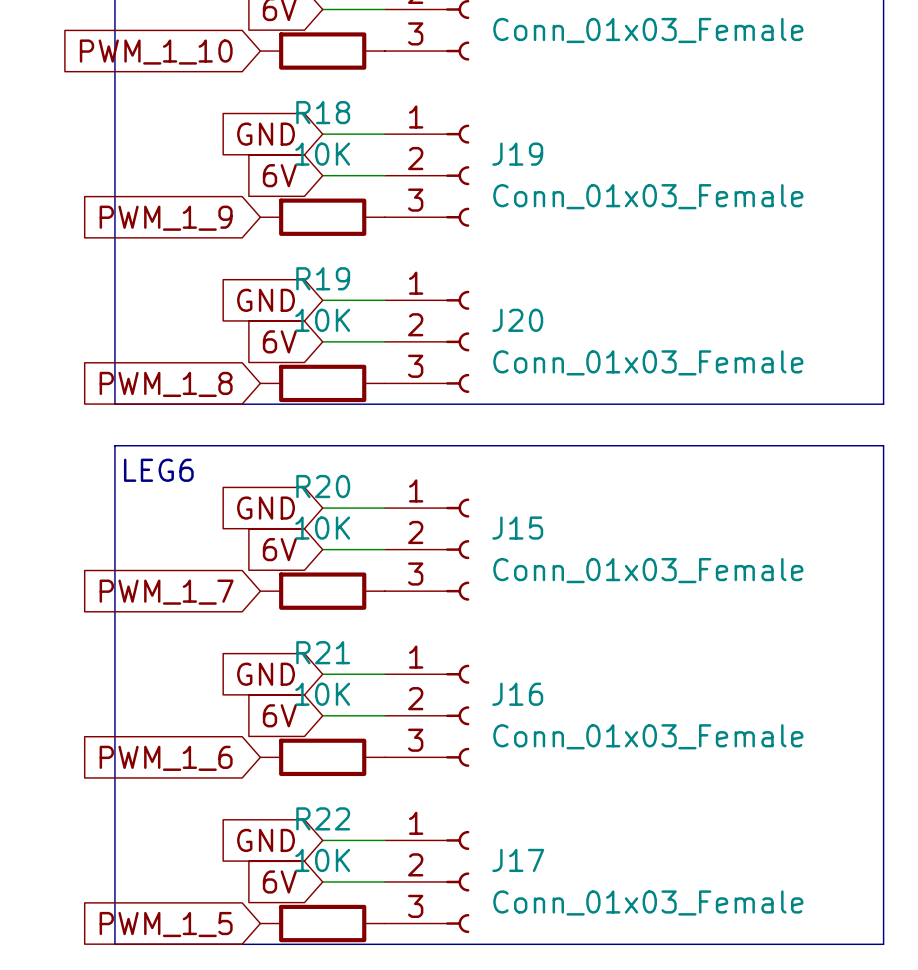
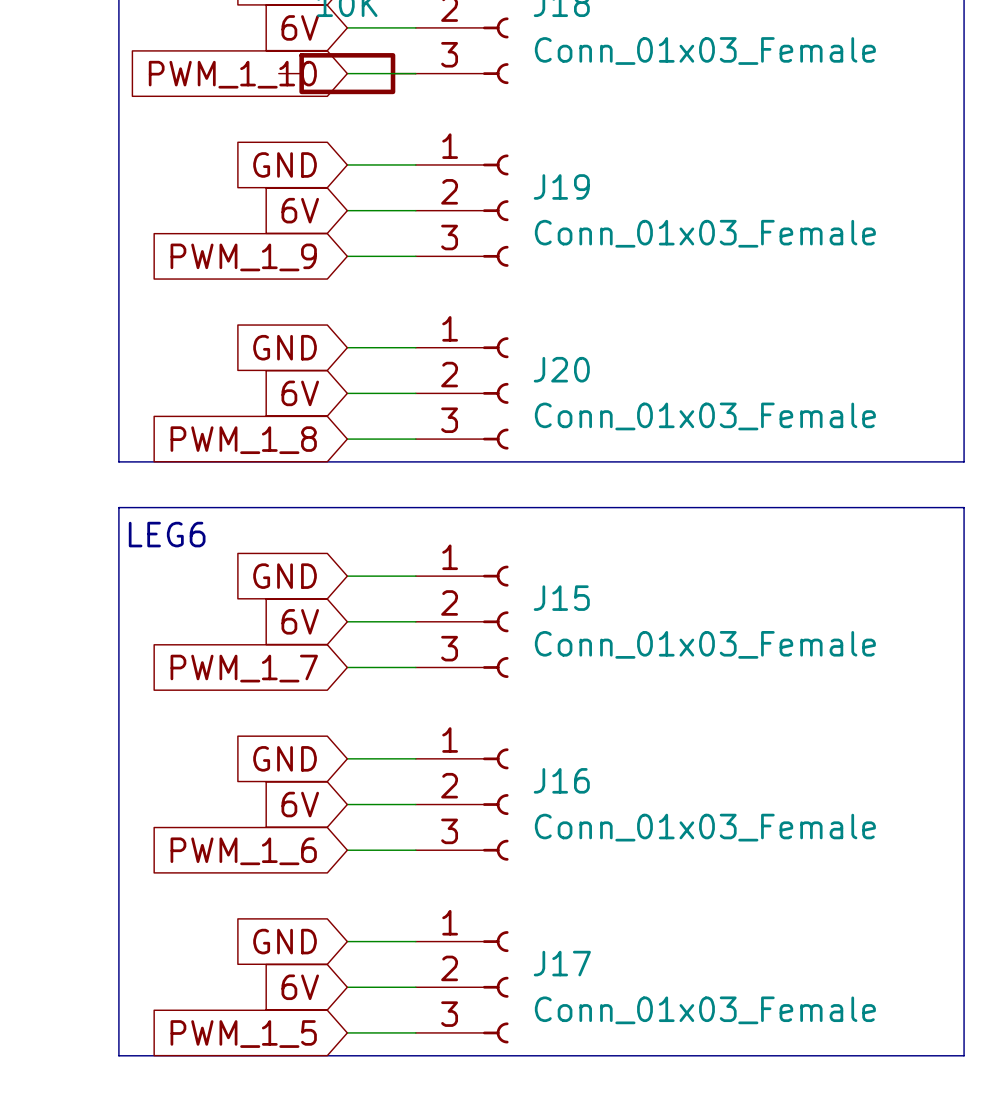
wire: none -> (347, 73) (415, 73)
global label position: PWM_1_10 (156, 52) -> PWM_1_10 (232, 74)
wire: none -> (347, 256) (415, 256)
R18: 10K (322, 217) -> none
global label position: PWM_1_9 (166, 218) -> PWM_1_9 (243, 257)
wire: none -> (347, 439) (415, 439)
R19: 10K (322, 383) -> none
global label position: PWM_1_8 (166, 384) -> PWM_1_8 (243, 440)
wire: none -> (347, 667) (415, 667)
R20: 10K (322, 591) -> none
global label position: PWM_1_7 (166, 592) -> PWM_1_7 (244, 668)
wire: none -> (347, 850) (415, 850)
R21: 10K (322, 757) -> none
global label position: PWM_1_6 (166, 758) -> PWM_1_6 (243, 851)
wire: none -> (347, 1032) (415, 1032)
R22: 10K (322, 923) -> none
global label position: PWM_1_5 (166, 924) -> PWM_1_5 (243, 1034)

